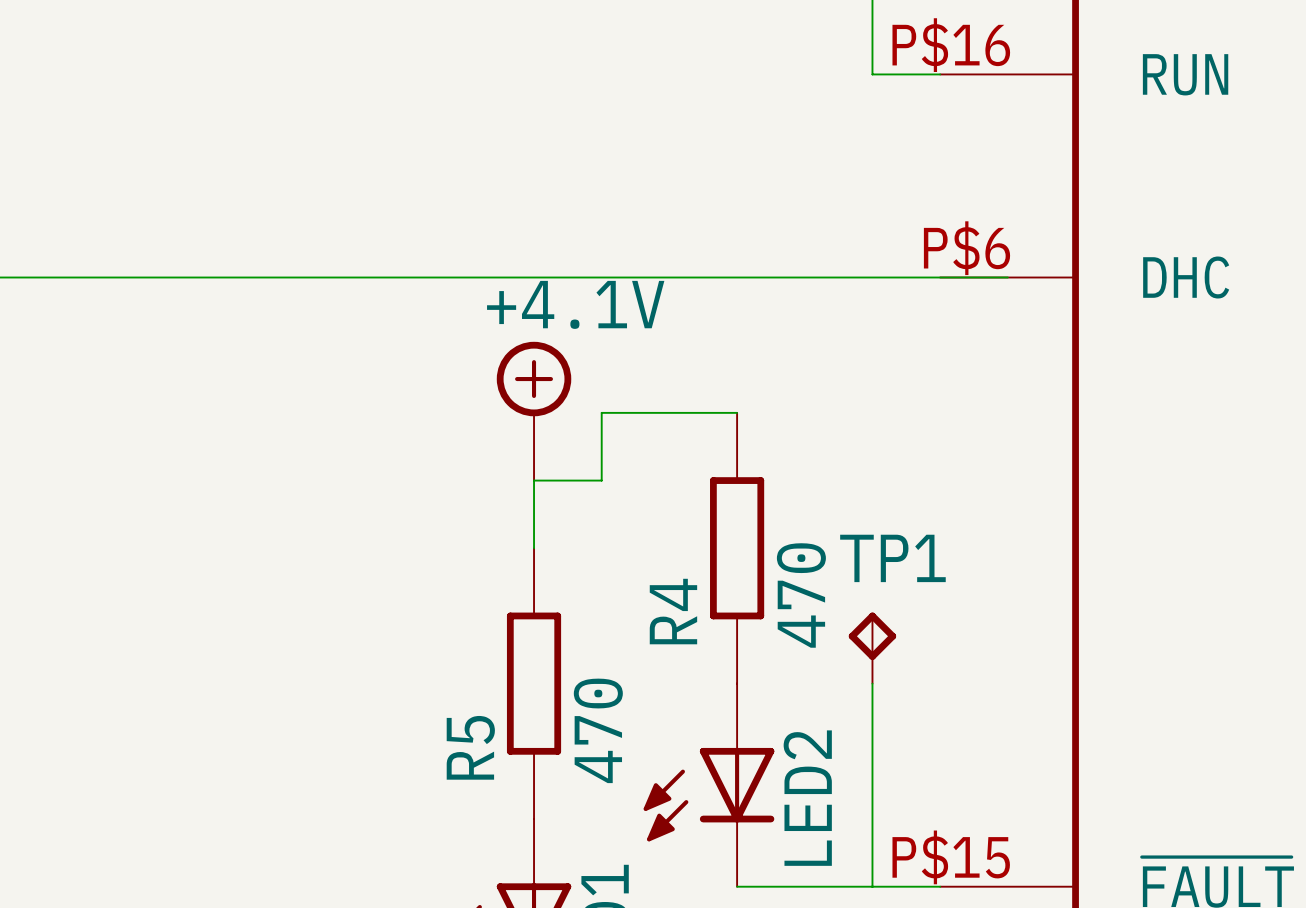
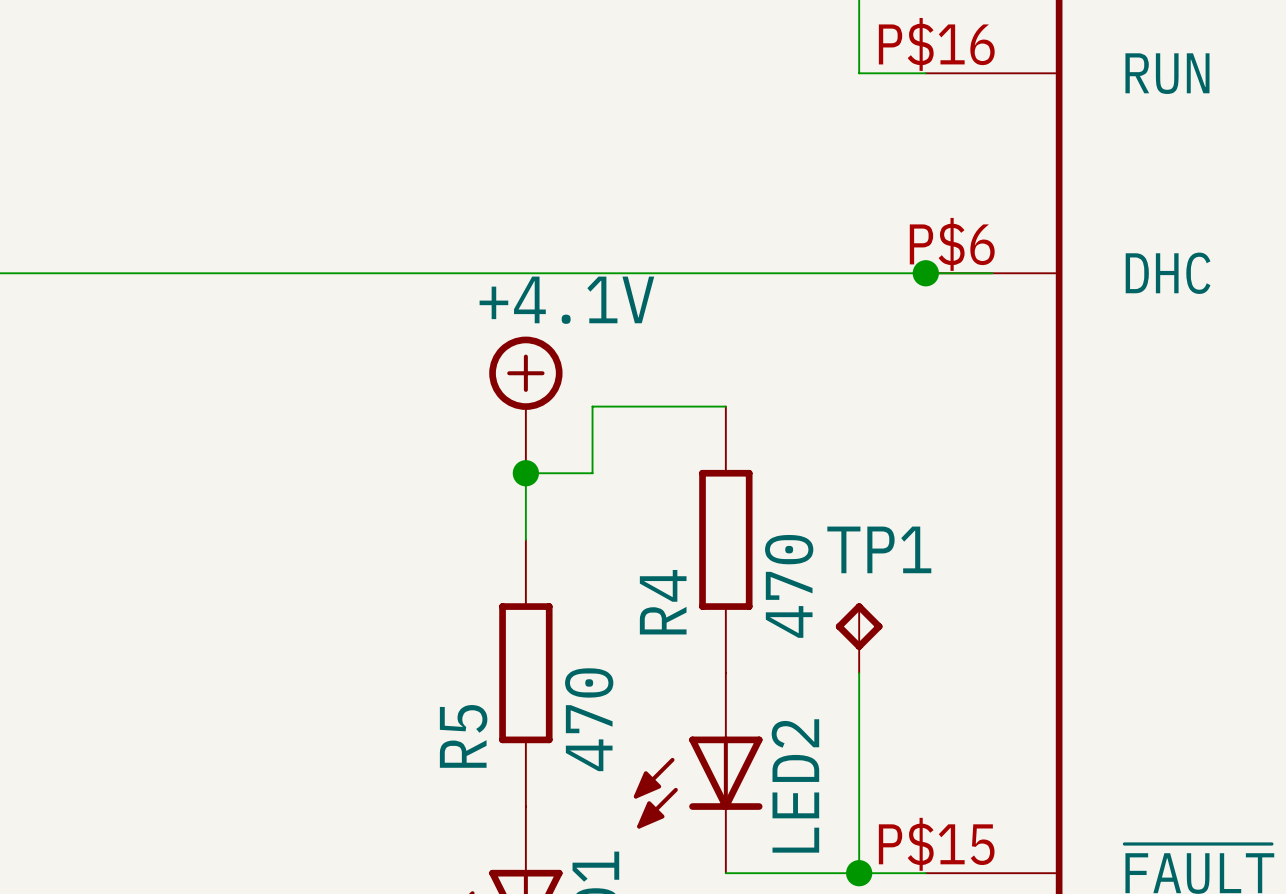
junction: none -> (925, 273)
junction: none -> (525, 473)
junction: none -> (859, 873)

